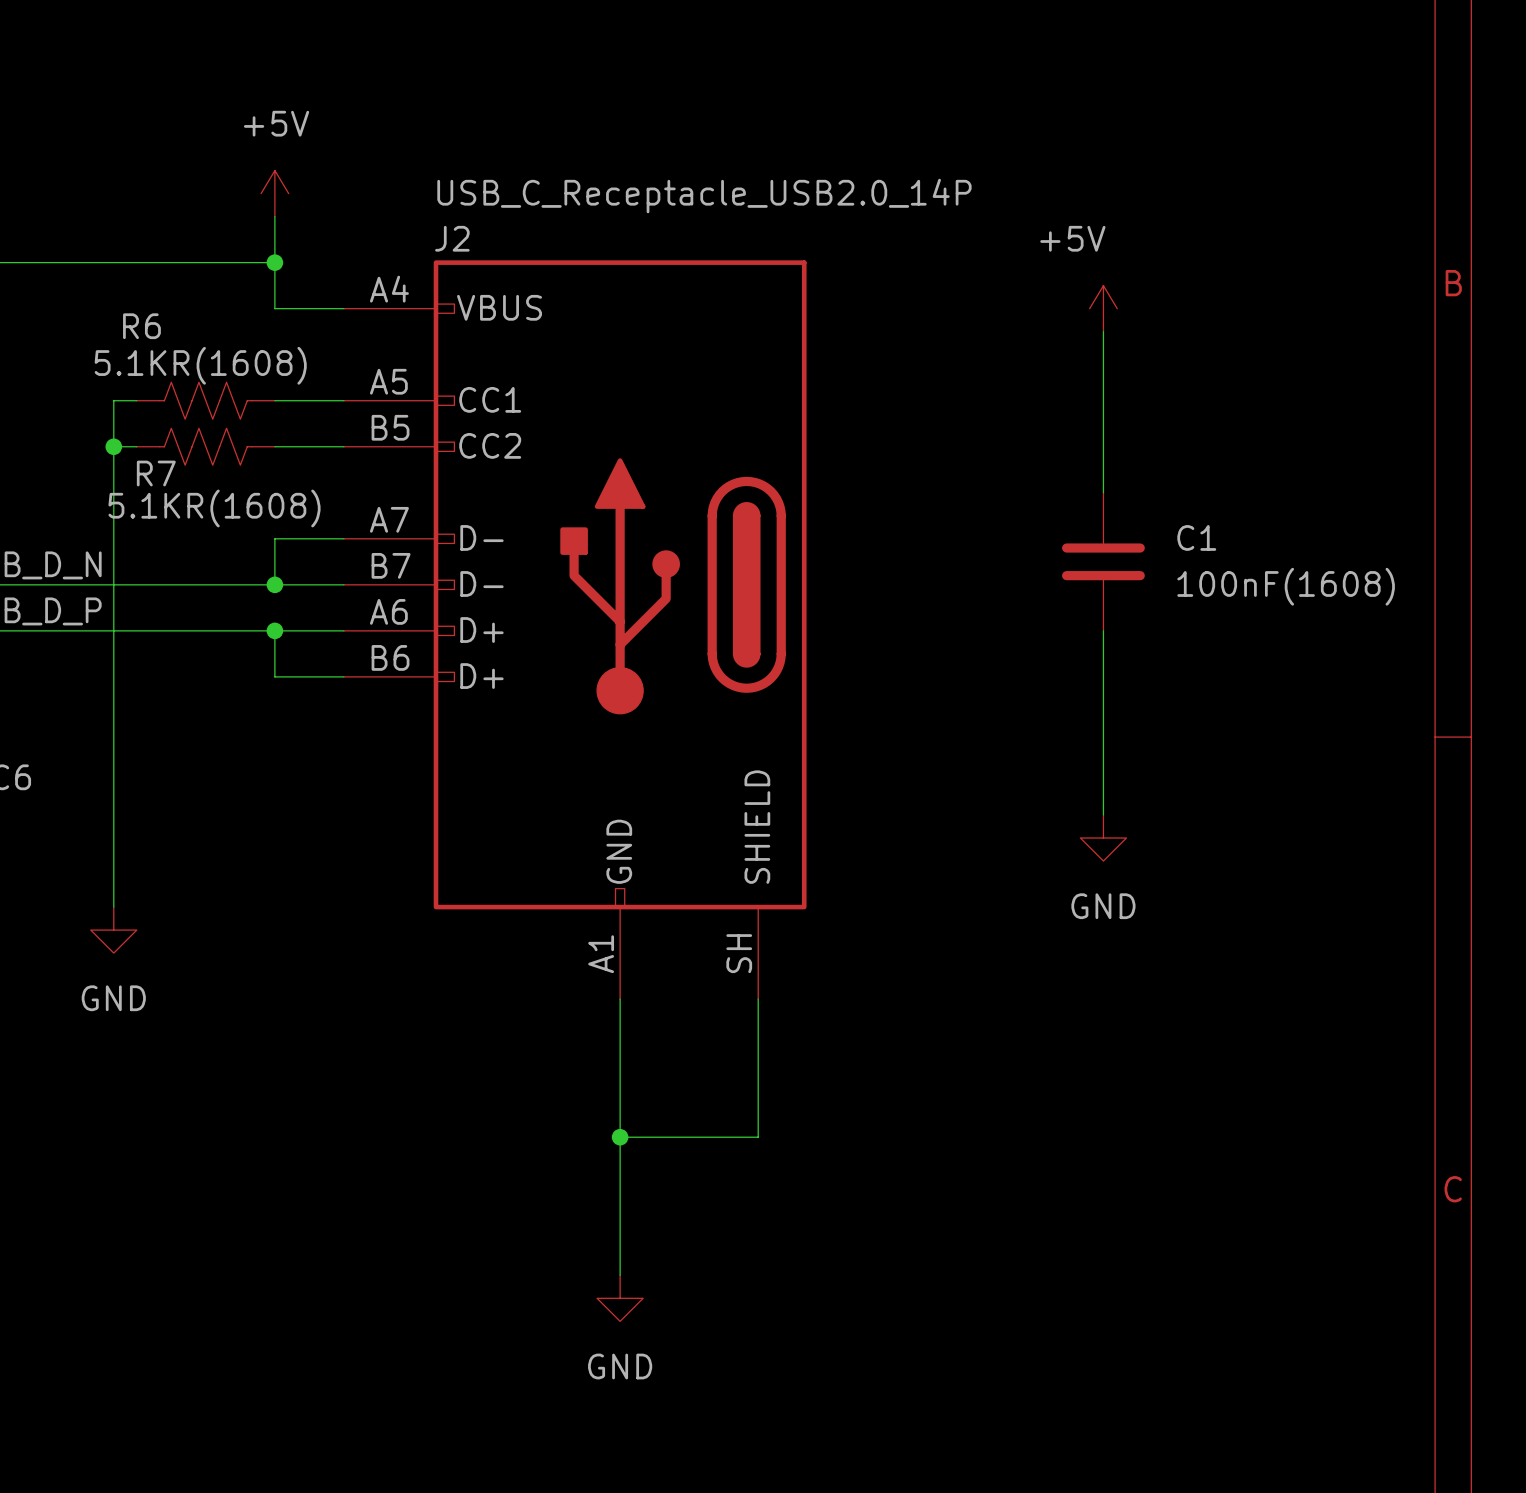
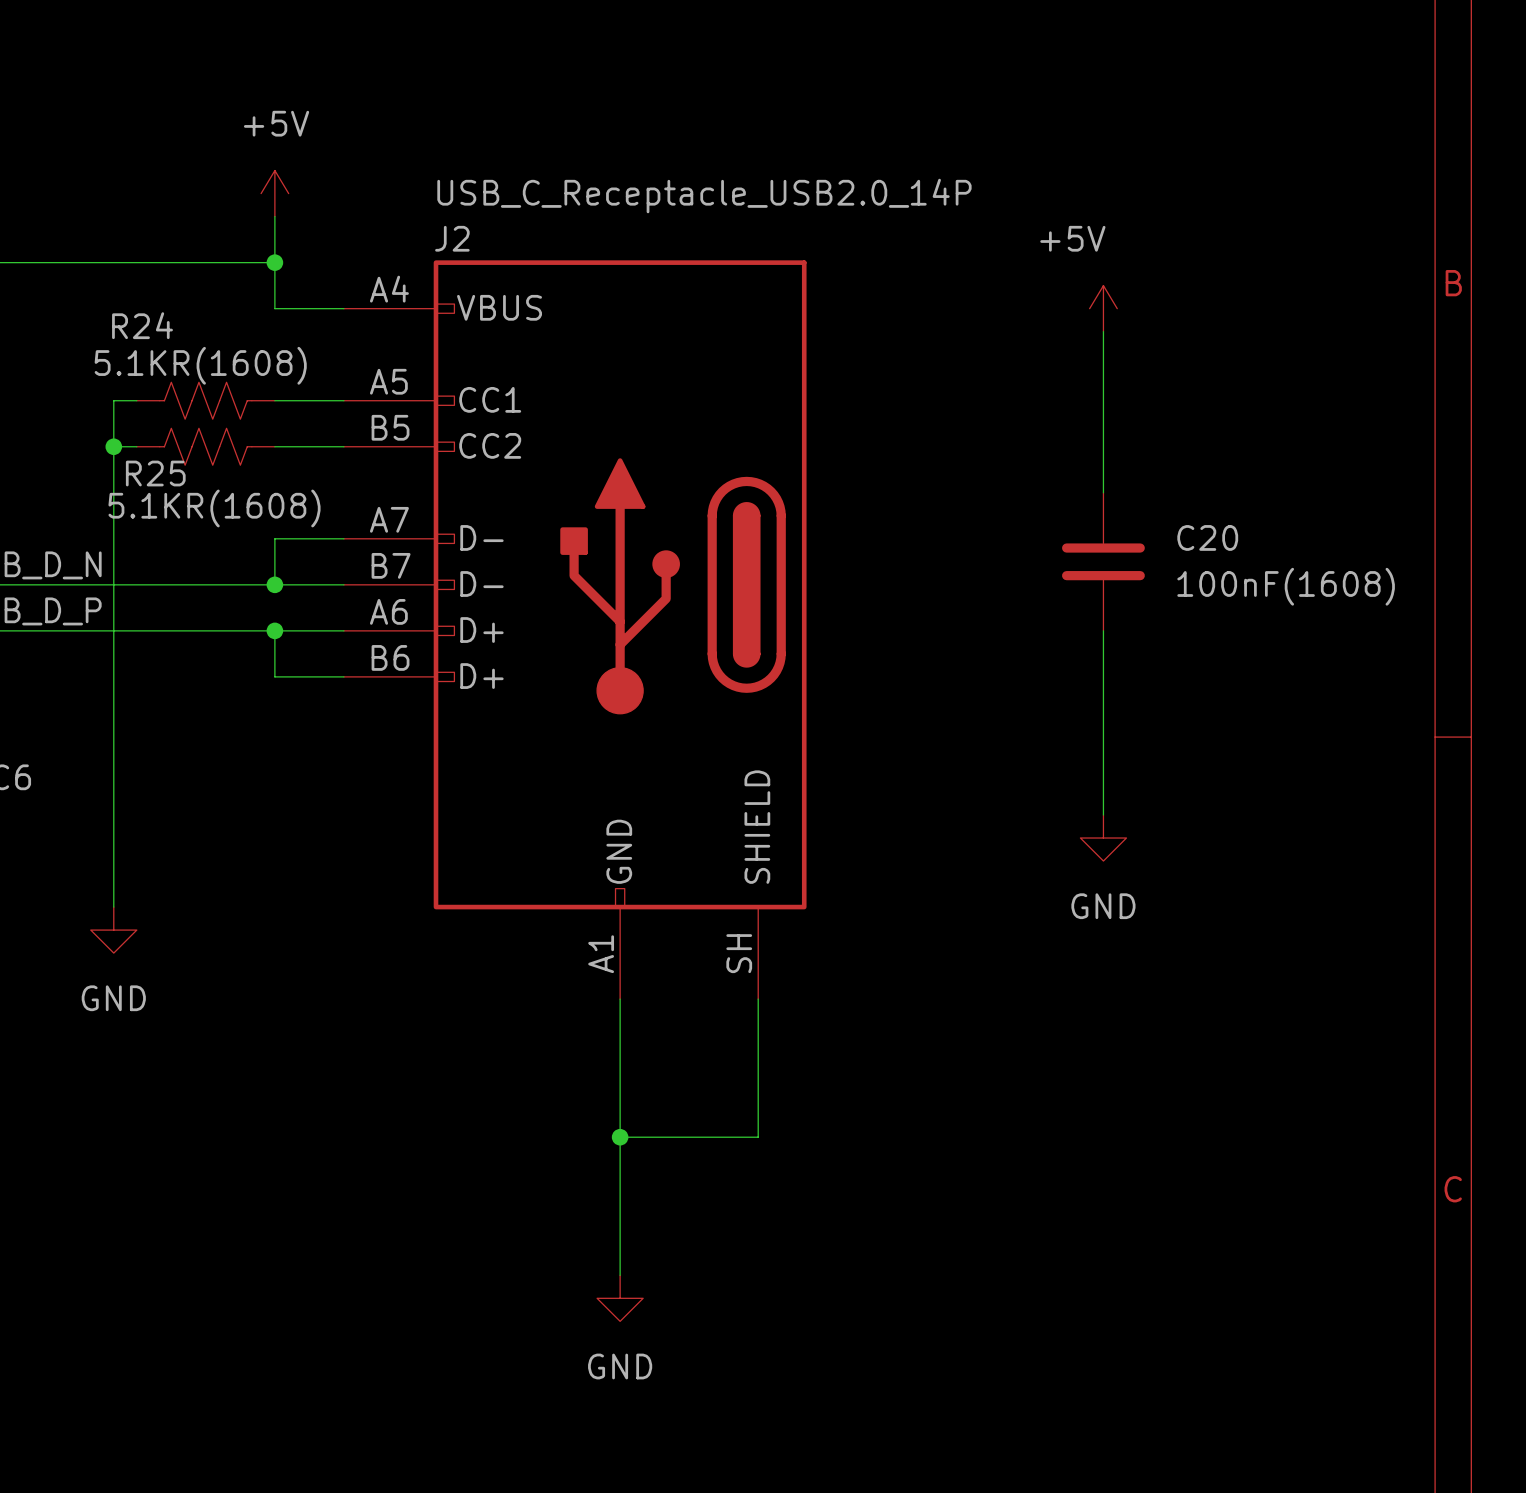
R6 name: R6 (141, 326) -> R24 (142, 325)
R7 name: R7 (156, 473) -> R25 (155, 473)
C1 name: C1 (1196, 537) -> C20 (1207, 537)

